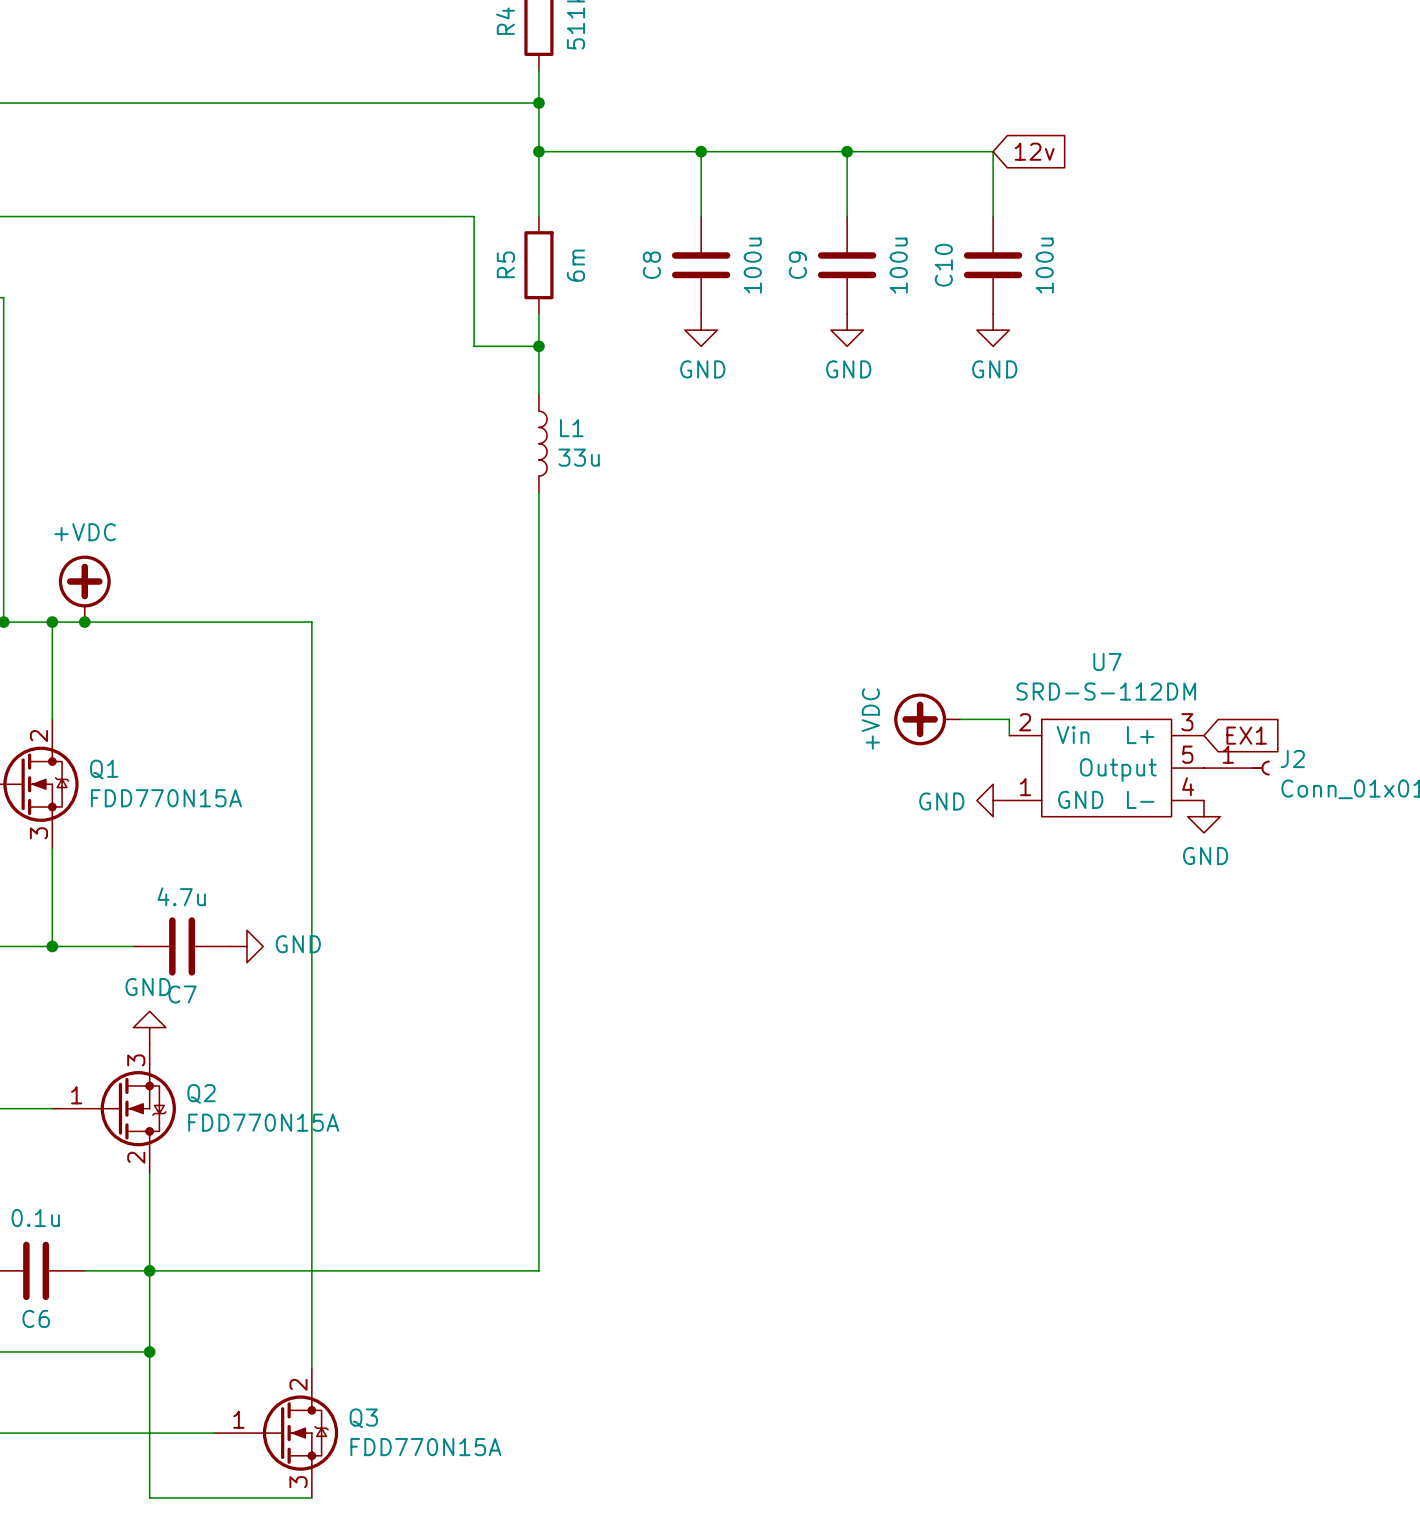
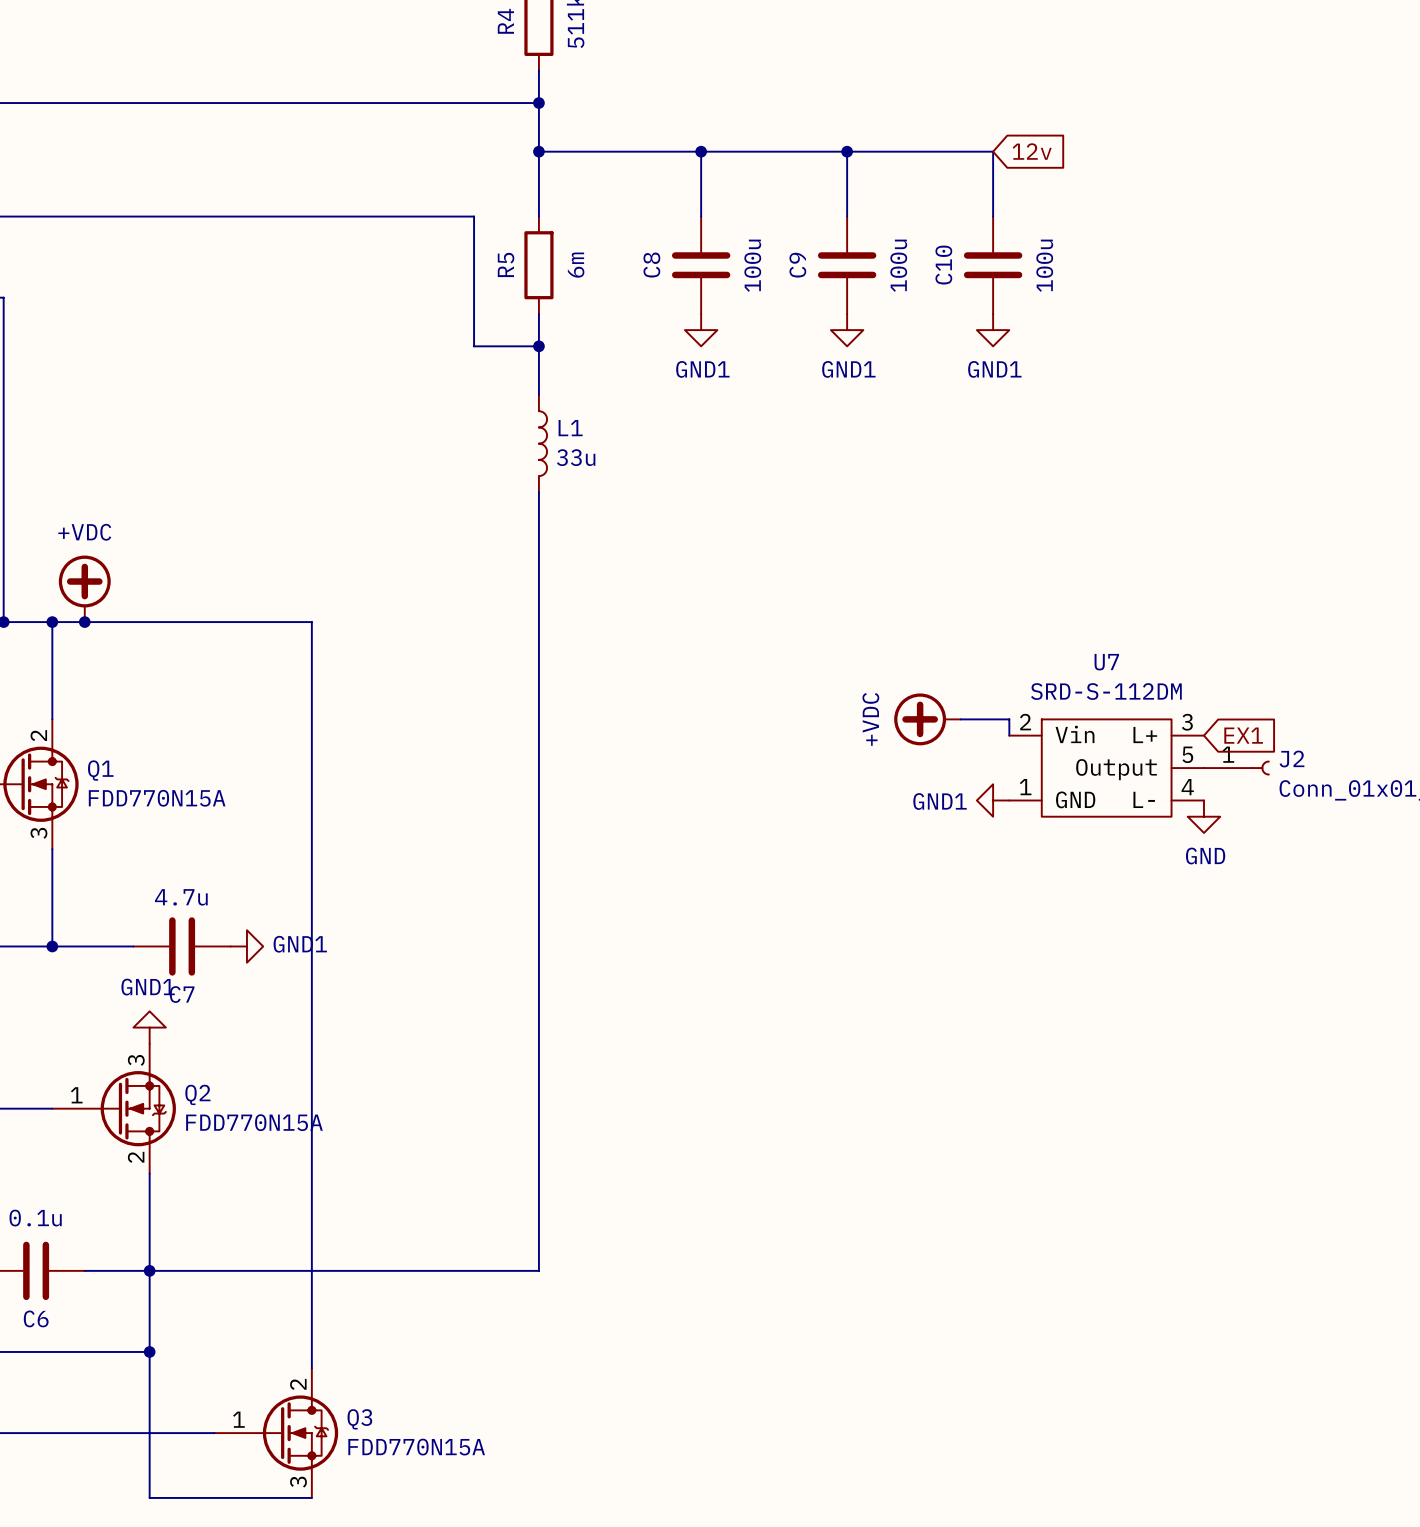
power symbol: GND (701, 330) -> GND1 (701, 330)
power symbol: GND (847, 330) -> GND1 (847, 330)
power symbol: GND (993, 330) -> GND1 (993, 330)
power symbol: GND (993, 800) -> GND1 (993, 800)
power symbol: GND (246, 946) -> GND1 (246, 946)
power symbol: GND (149, 1027) -> GND1 (149, 1027)

